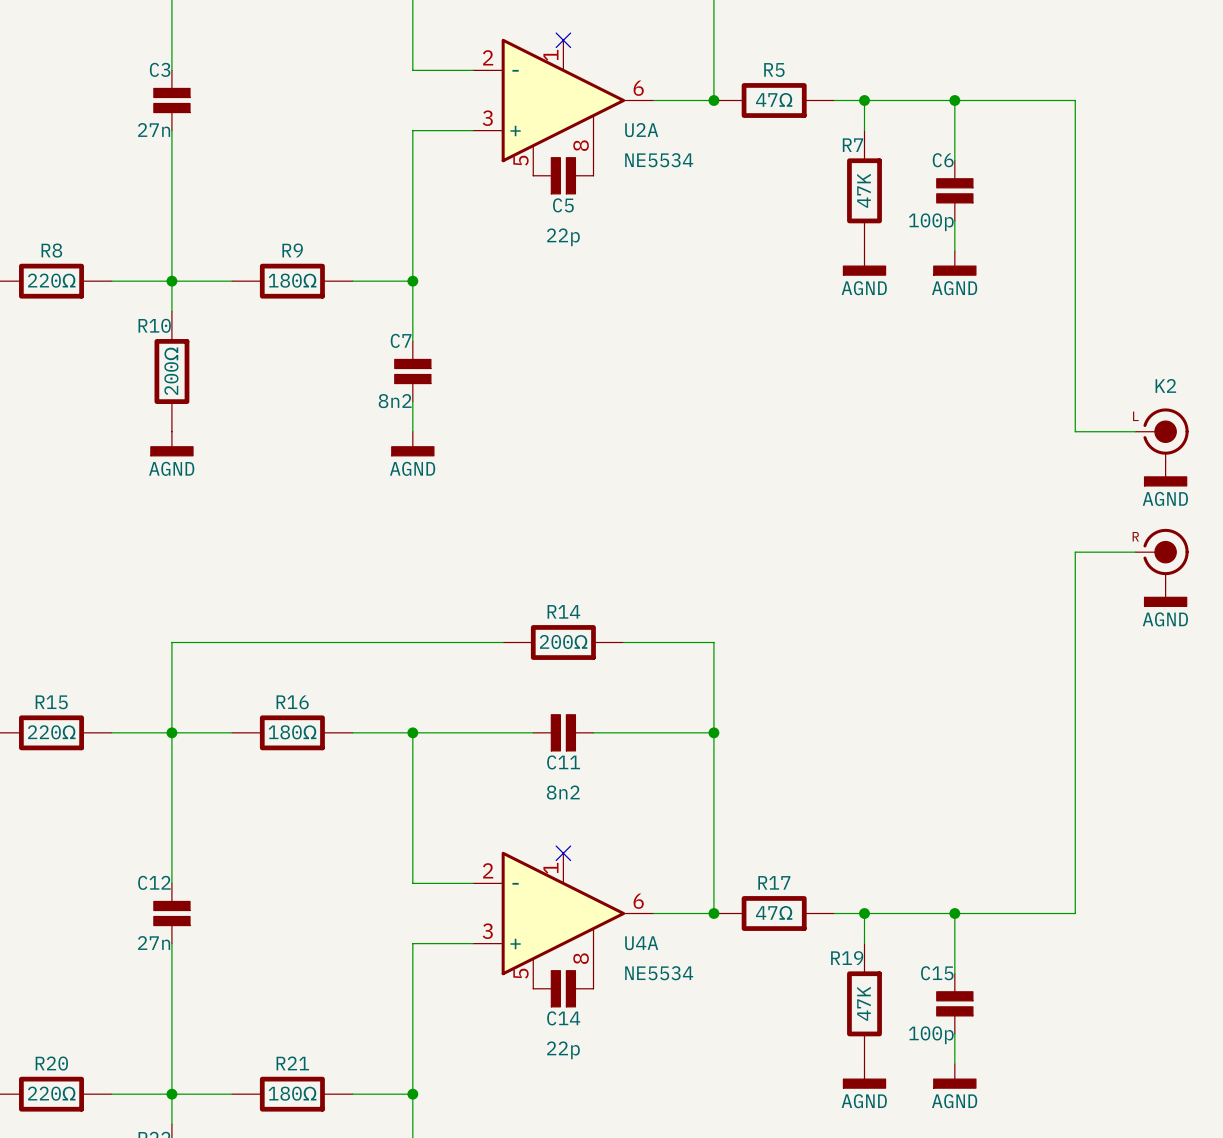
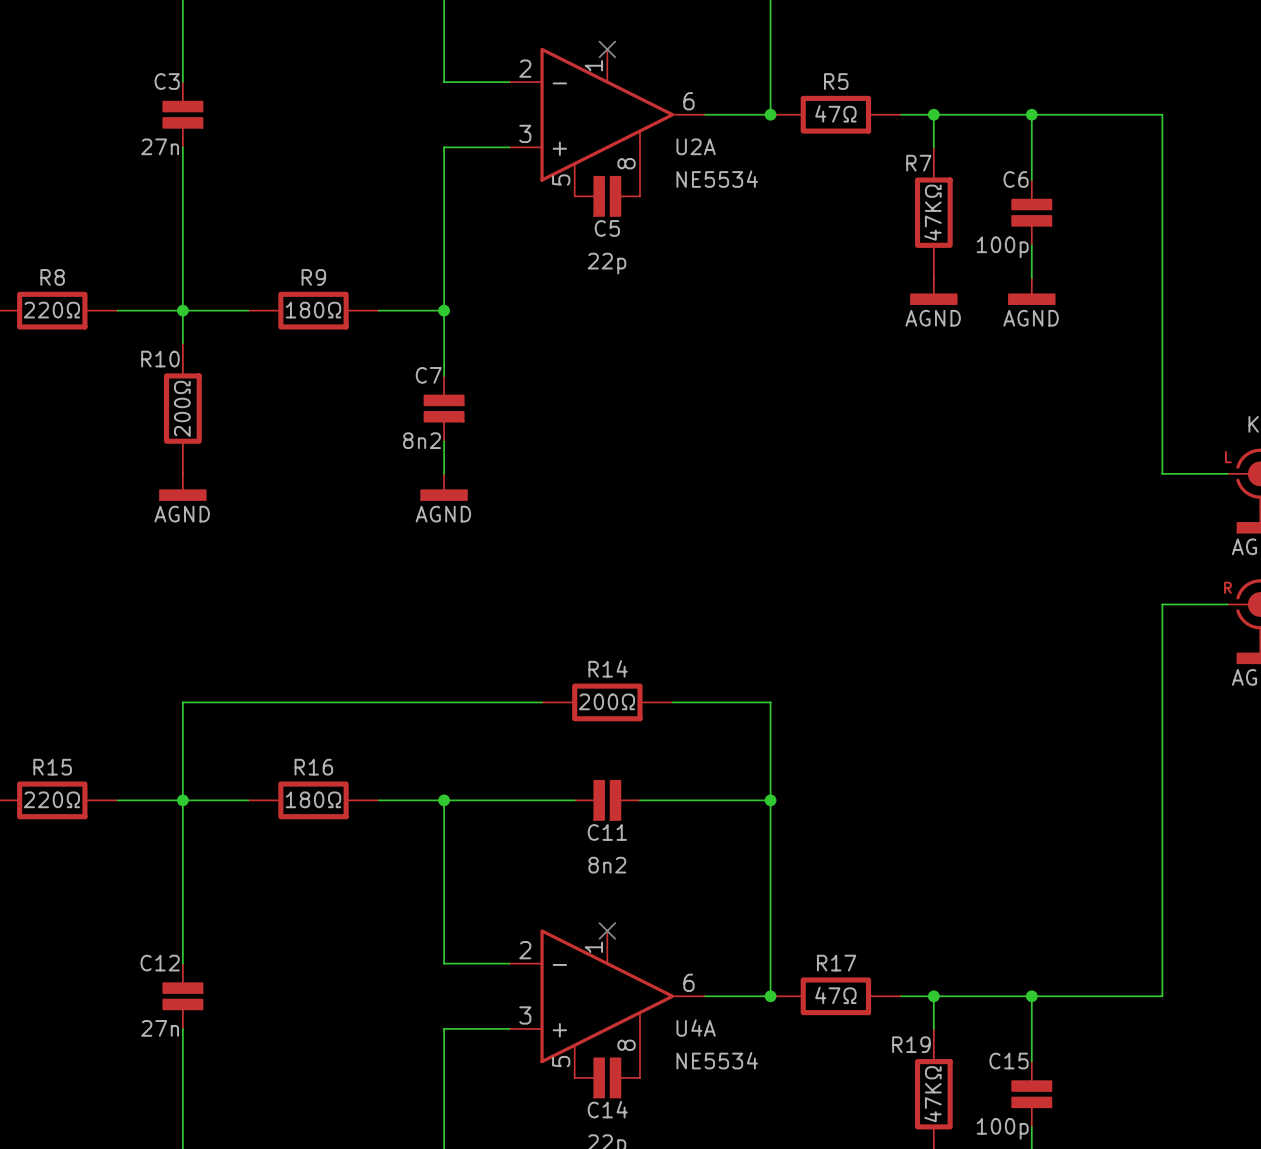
R7 value: 47K (863, 190) -> 47KΩ (932, 212)
R19 value: 47K (863, 1003) -> 47KΩ (932, 1094)

